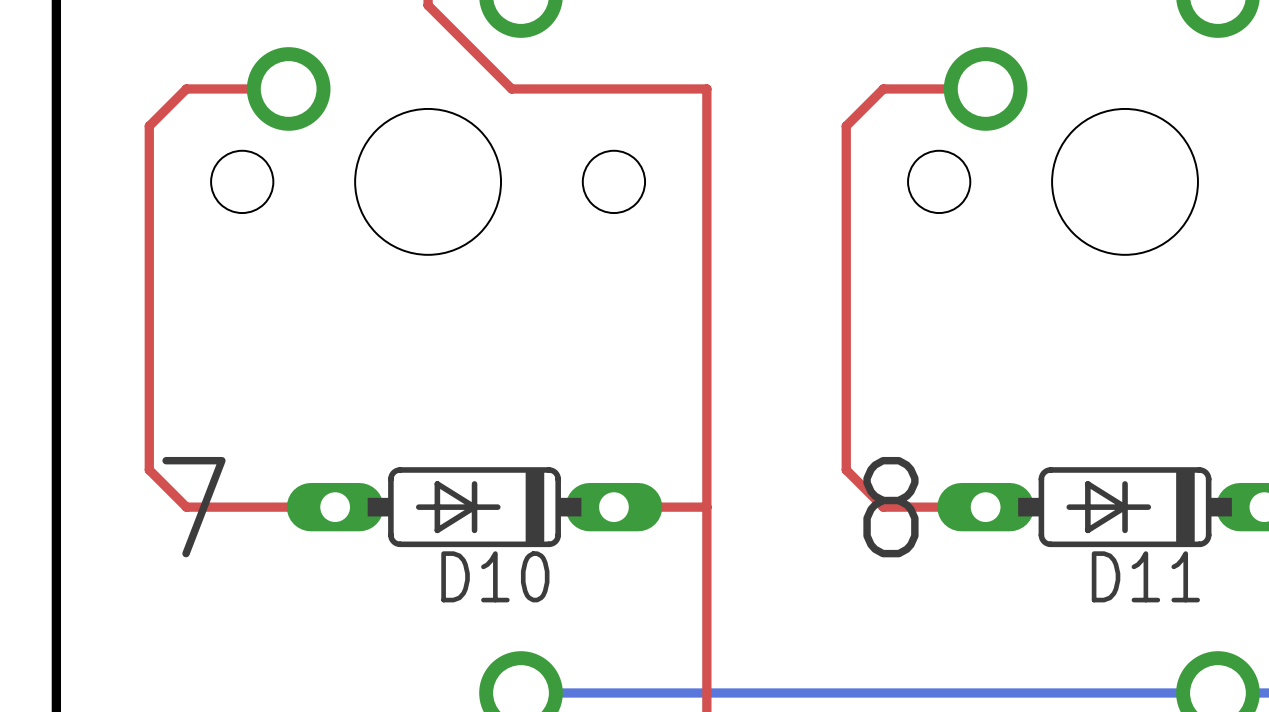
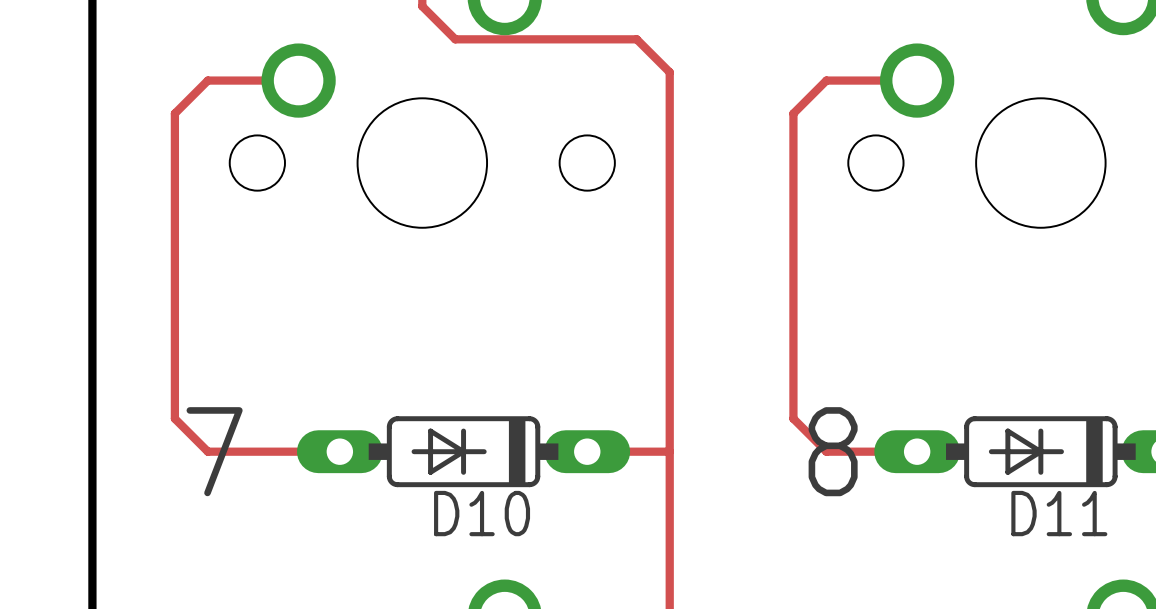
top track: (465, 42) (511, 88) (706, 88) -> (455, 39) (636, 39) (669, 72) (669, 80)

